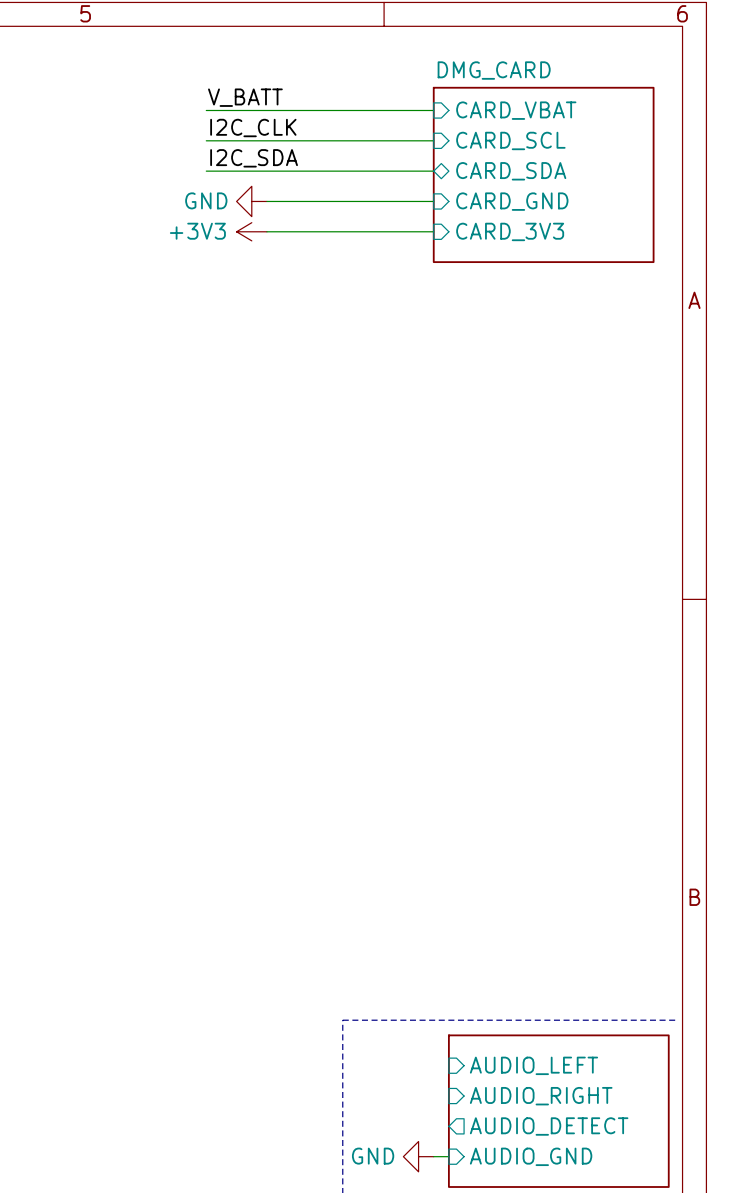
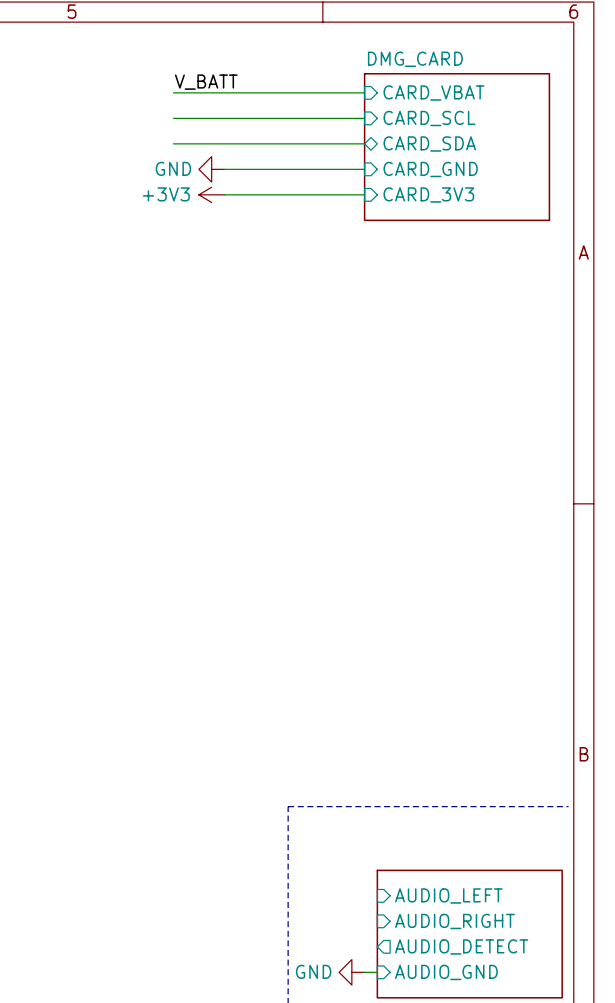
label: I2C_CLK (253, 128) -> none
label: I2C_SDA (254, 158) -> none
line: (342, 1020) (676, 1020) -> (288, 857) (288, 806) (568, 806)

